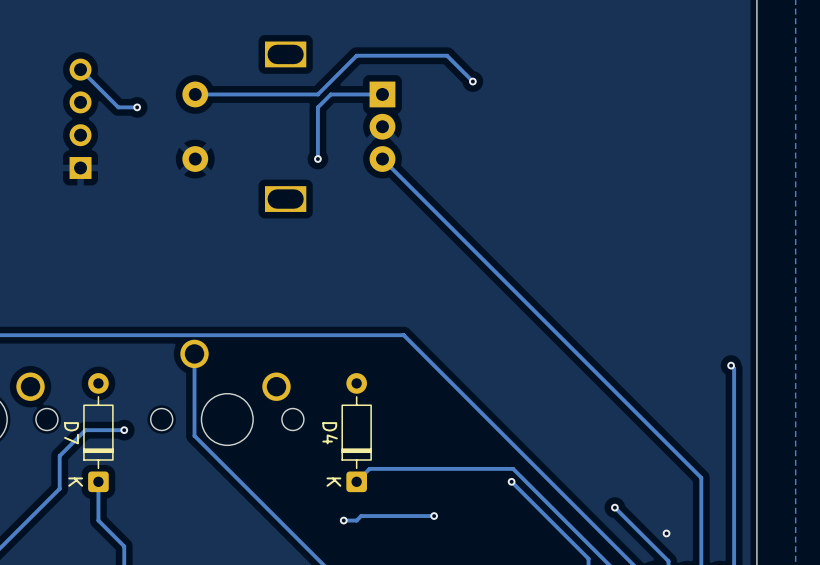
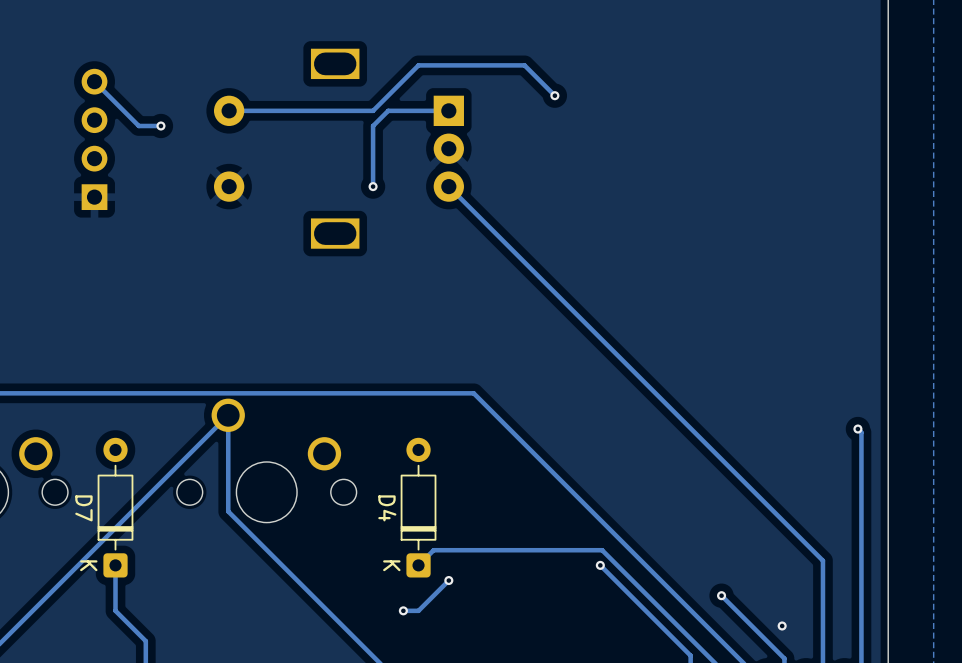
track: (124, 430) (85, 430) (59, 455) (59, 488) -> (228, 415) (70, 573)
via: (124, 430) -> none
track: (434, 516) (361, 516) -> (448, 580) (423, 605)
via position: (434, 516) -> (448, 580)

